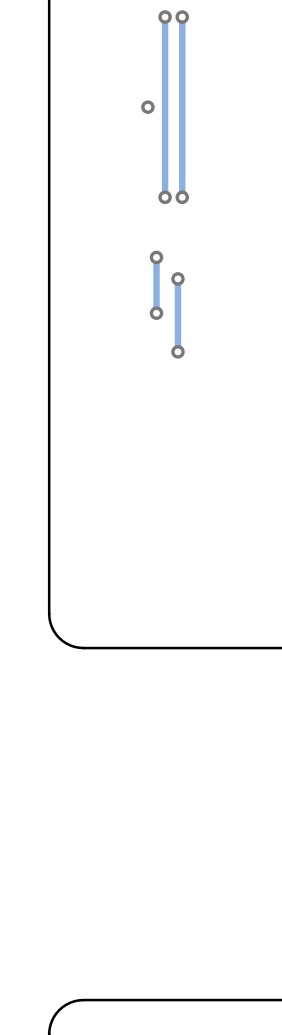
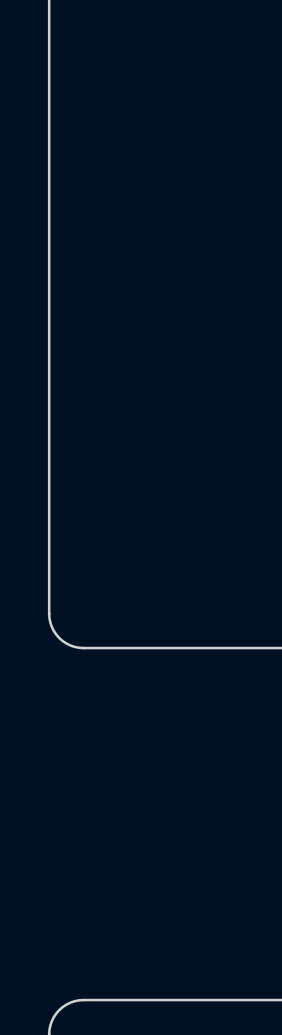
track: (165, 17) (165, 197) -> none
via: (165, 17) -> none
track: (182, 17) (182, 197) -> none
via: (182, 17) -> none
via: (147, 107) -> none
via: (165, 197) -> none
via: (182, 197) -> none
track: (156, 257) (156, 313) -> none
via: (156, 257) -> none
track: (177, 278) (177, 351) -> none
via: (177, 278) -> none
via: (156, 313) -> none
via: (177, 351) -> none

